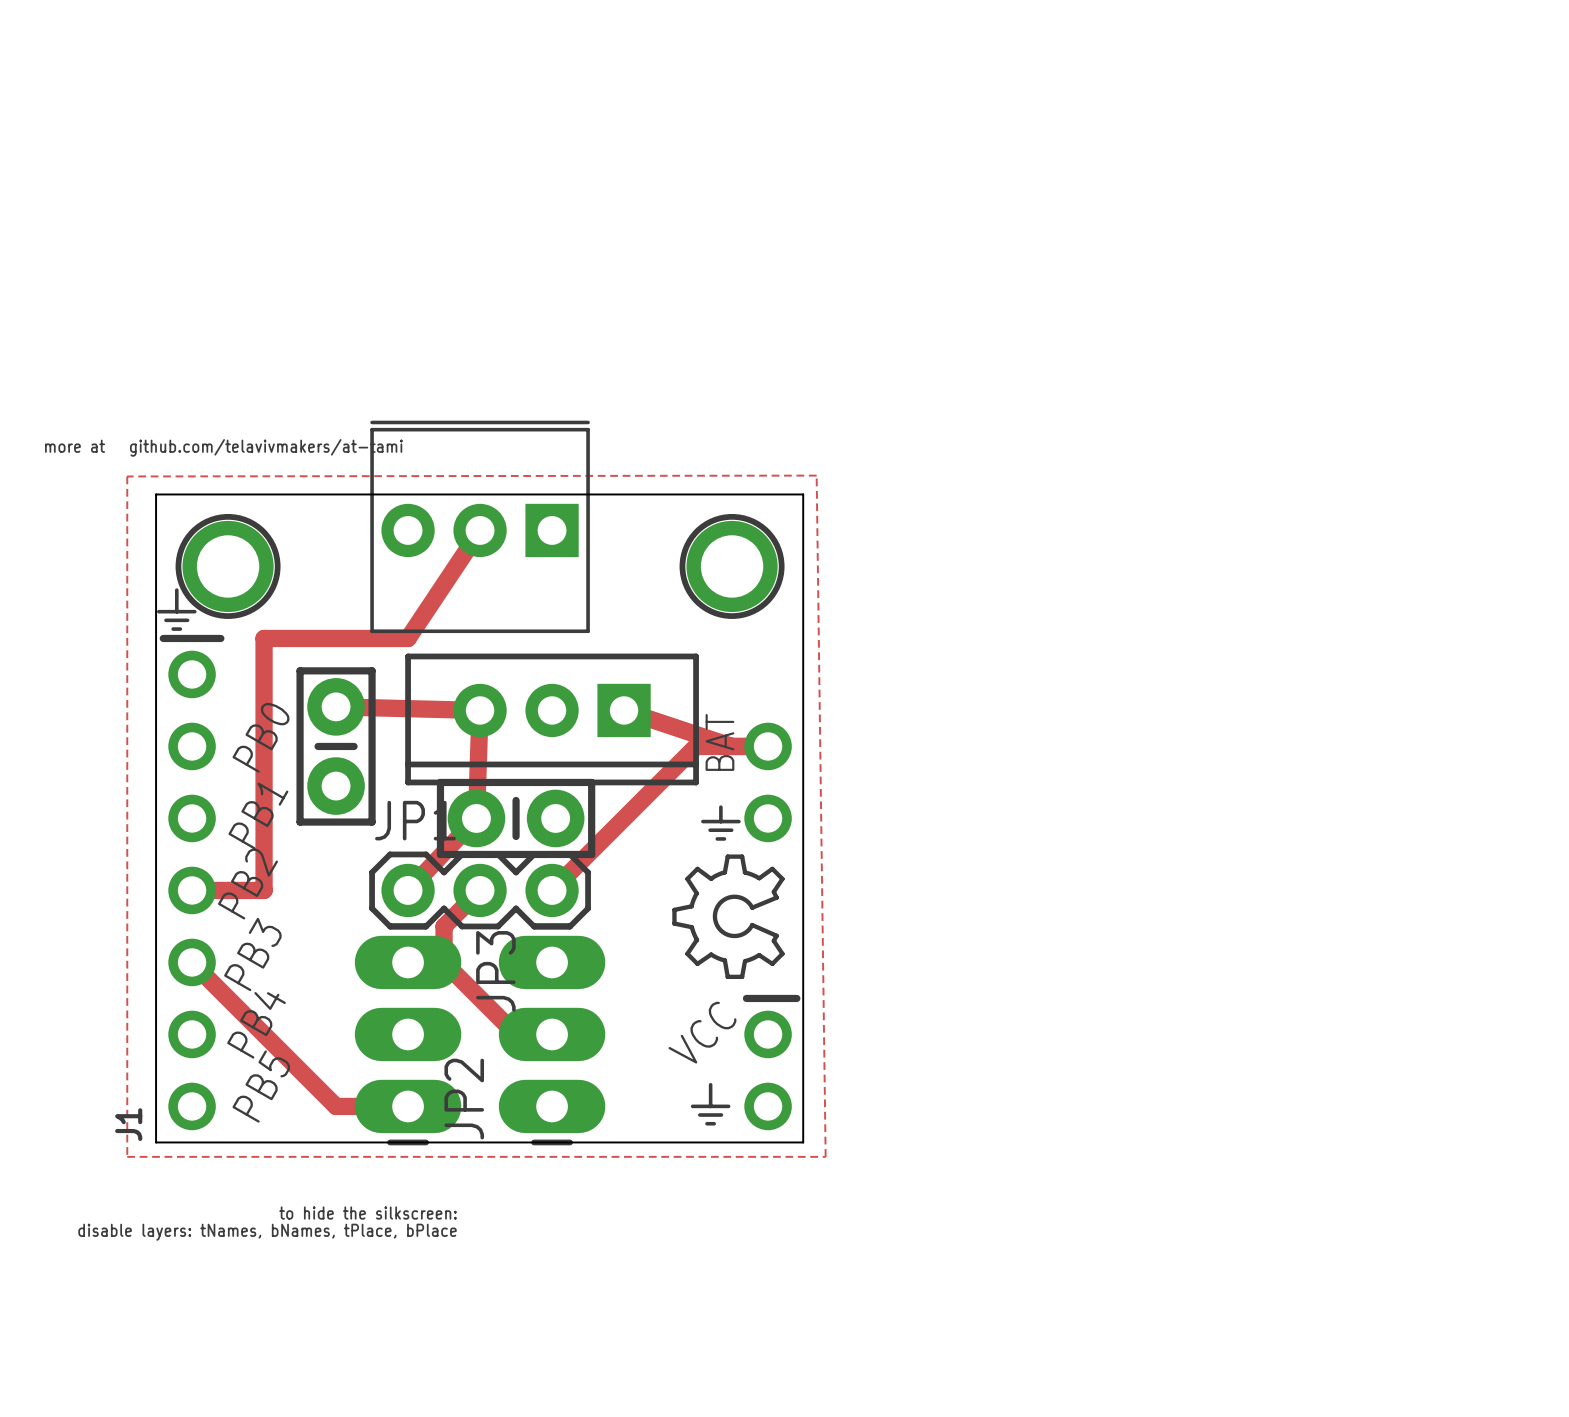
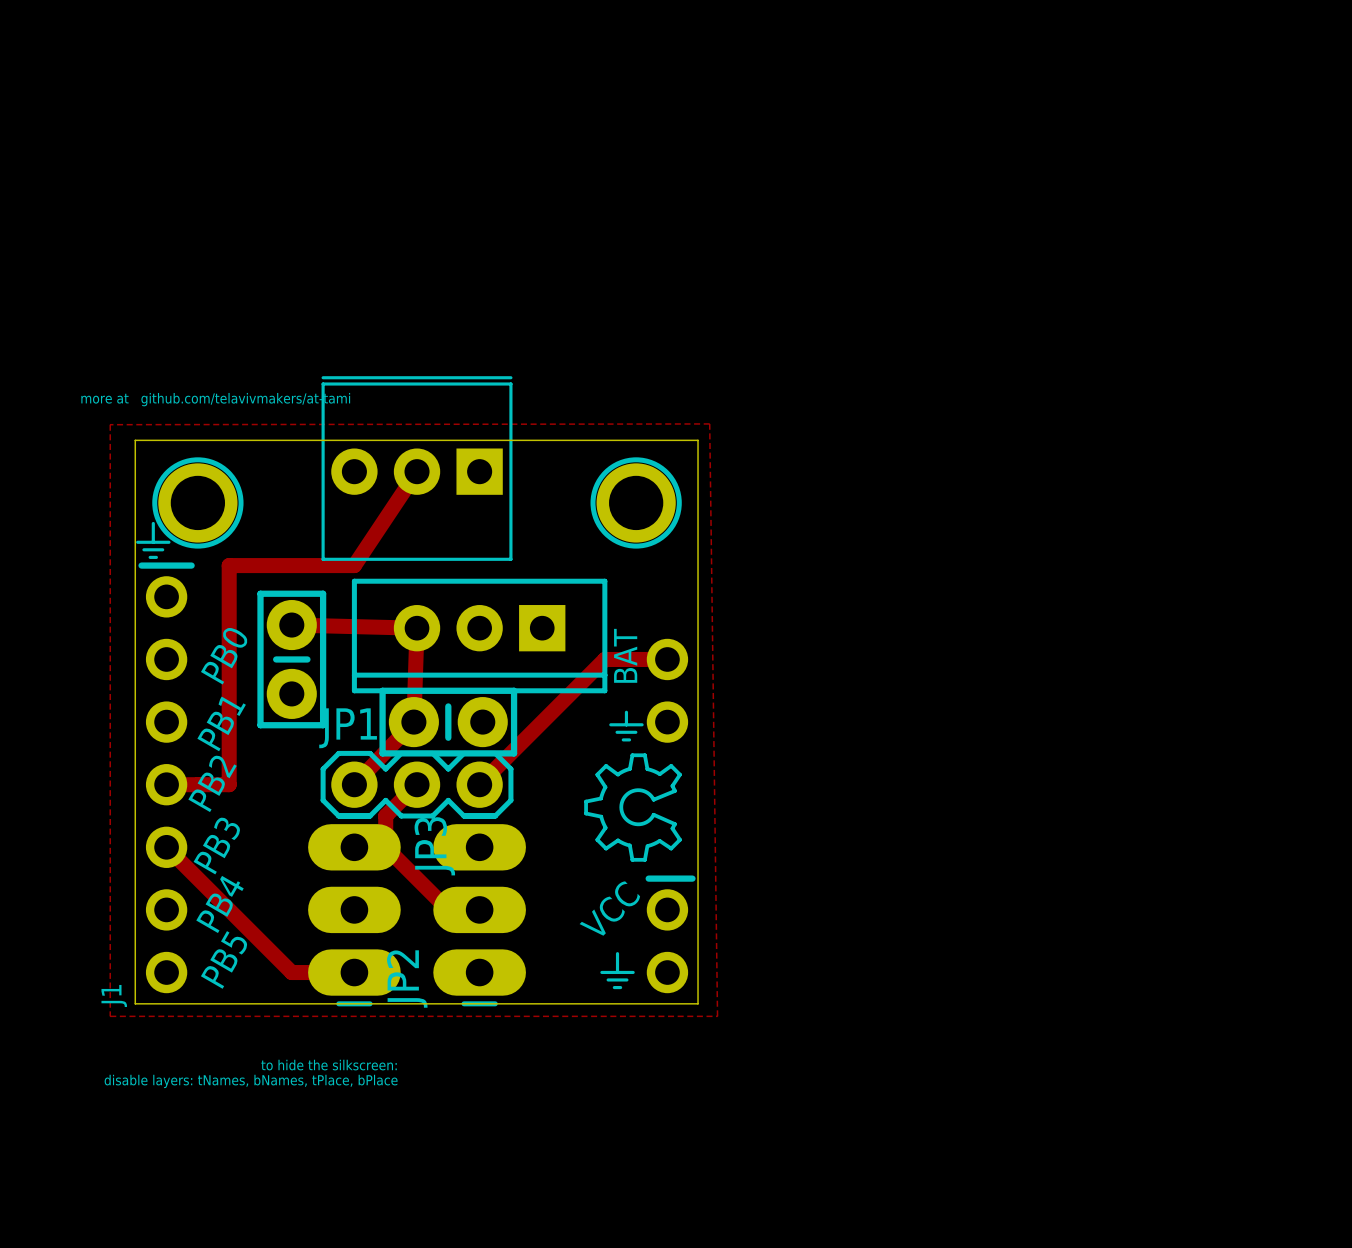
track: (624, 710) (732, 746) -> none

